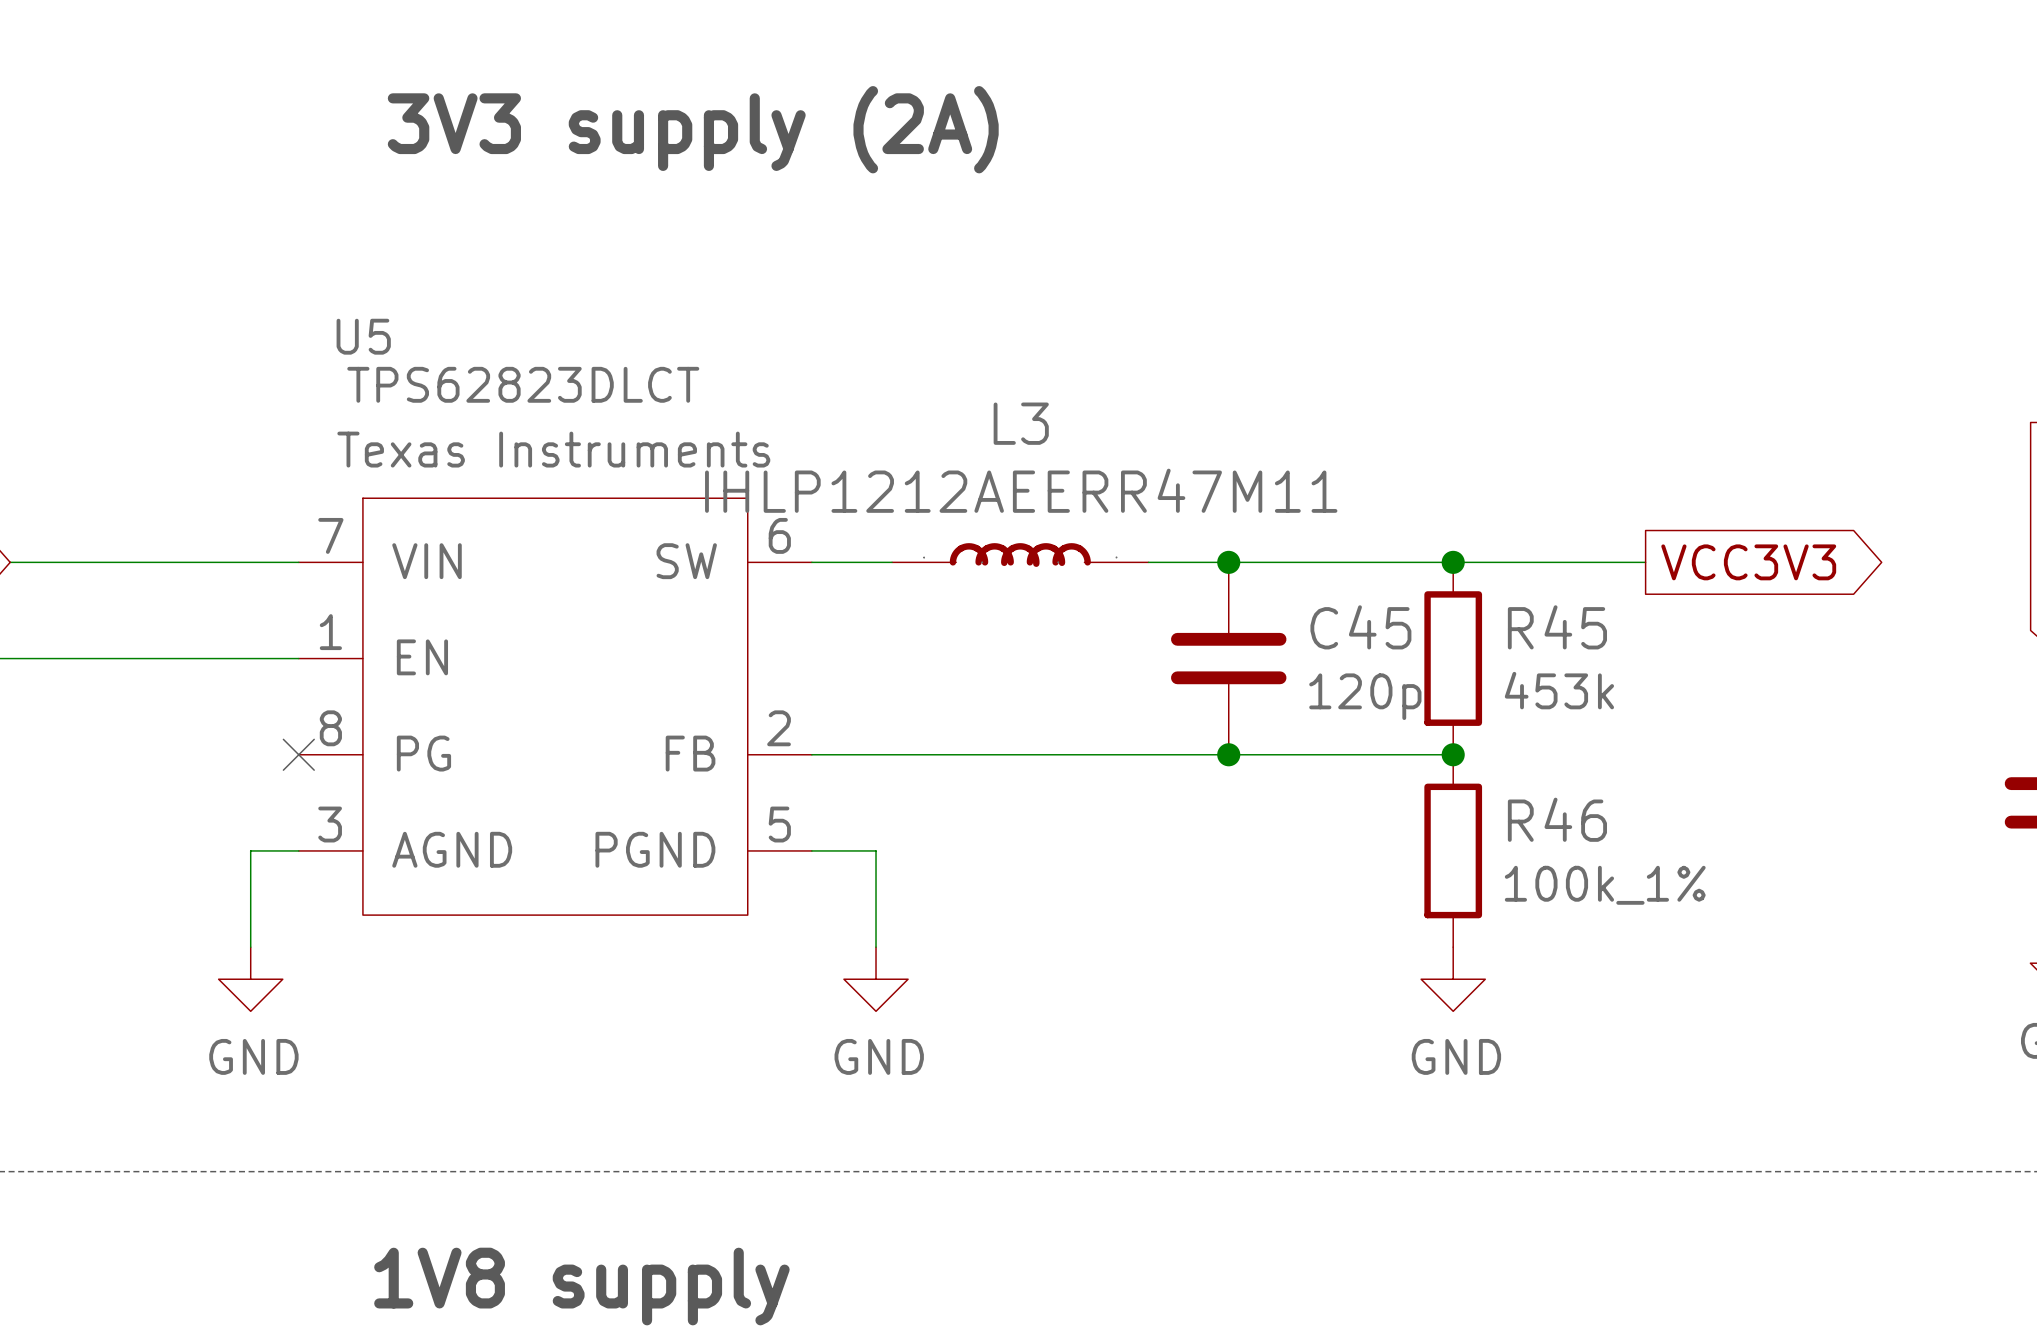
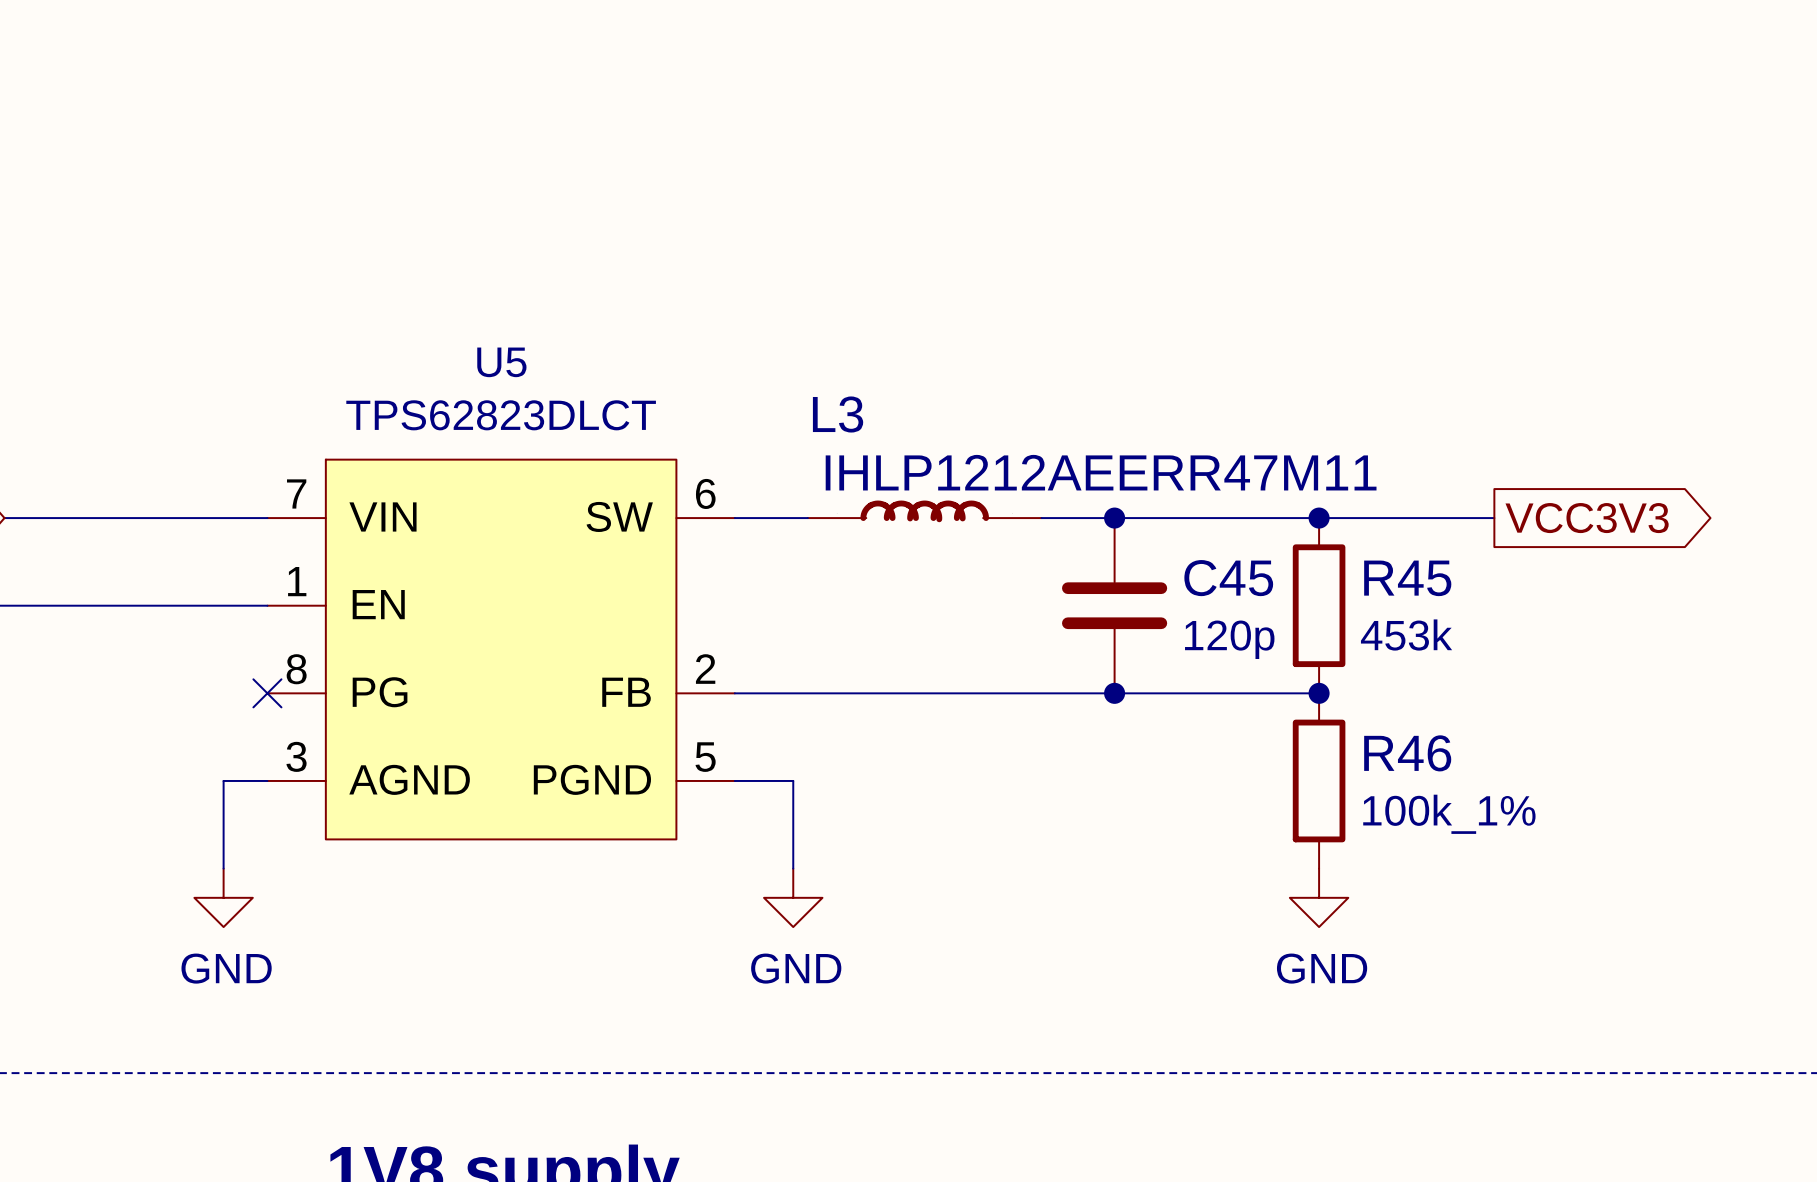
text: 3V3 supply (2A) (693, 129) -> none
U5 name position: U5 (363, 336) -> U5 (501, 362)
U5 text: TPS62823DLCT (523, 384) -> none
L3 name position: L3 (1021, 423) -> L3 (838, 414)
U5 text: Texas Instruments (553, 449) -> none
U5 value: none -> TPS62823DLCT (501, 415)
L3 value position: IHLP1212AEERR47M11 (1021, 490) -> IHLP1212AEERR47M11 (1101, 472)

